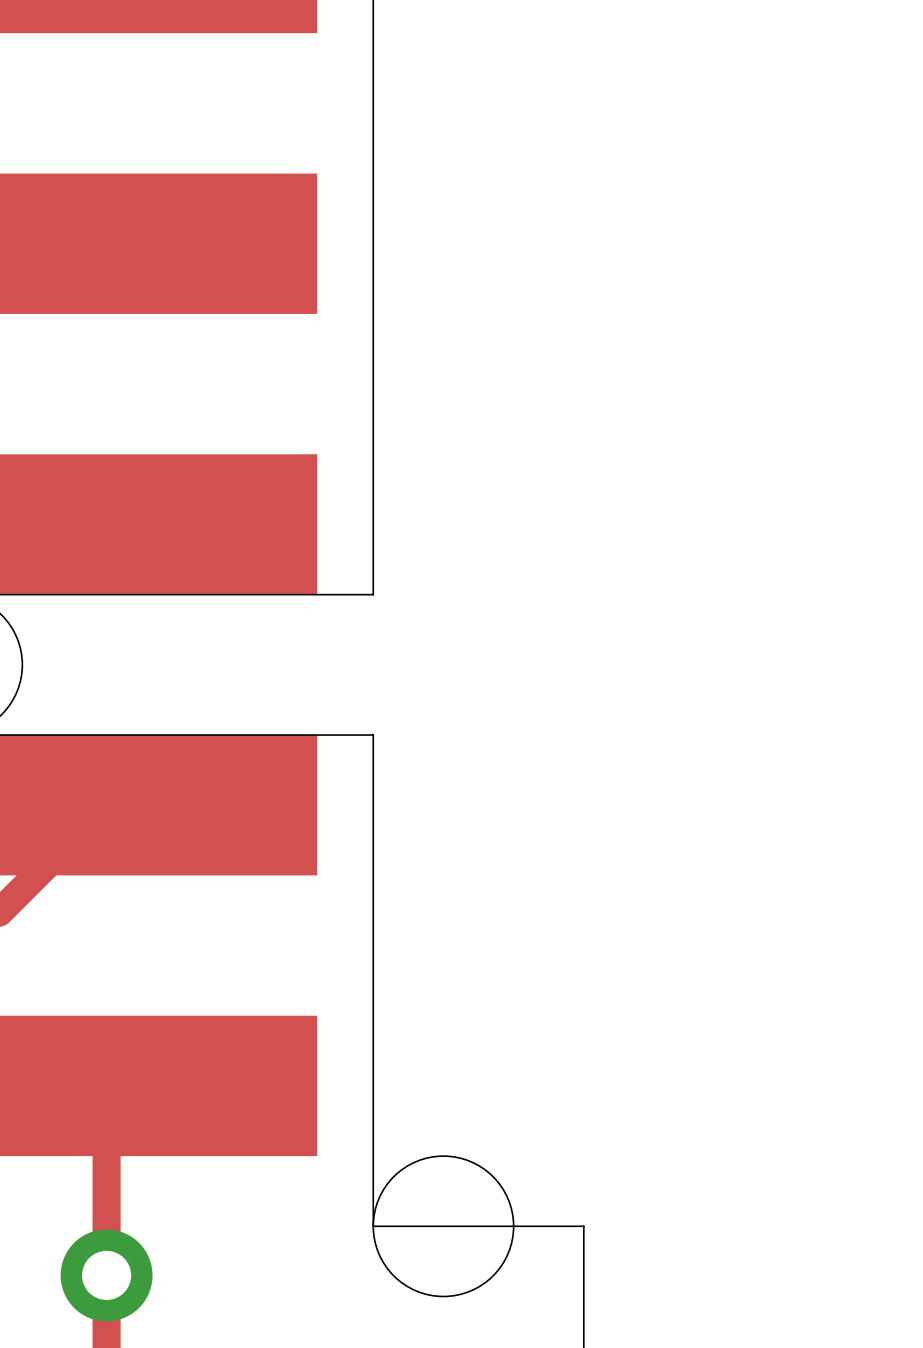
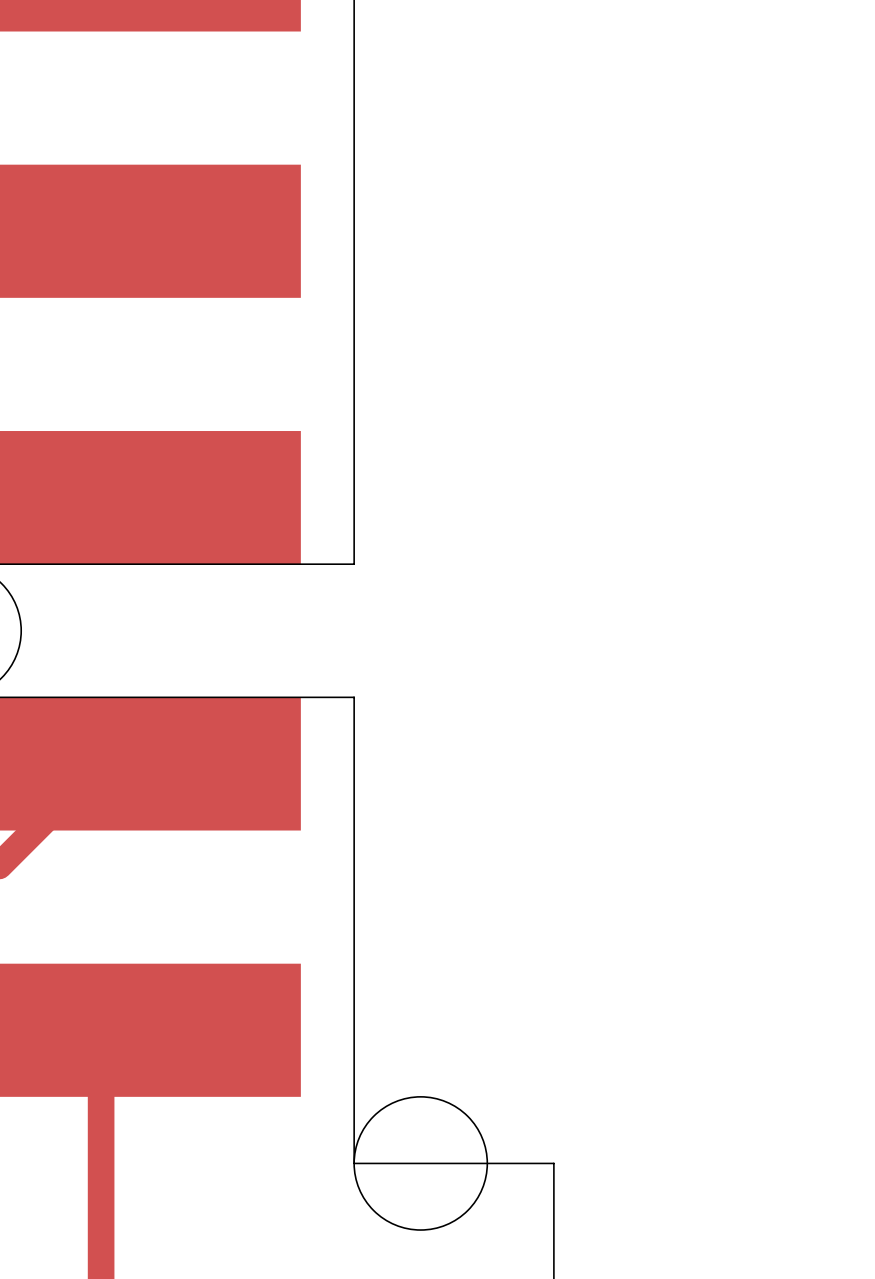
via: (106, 1275) -> none

